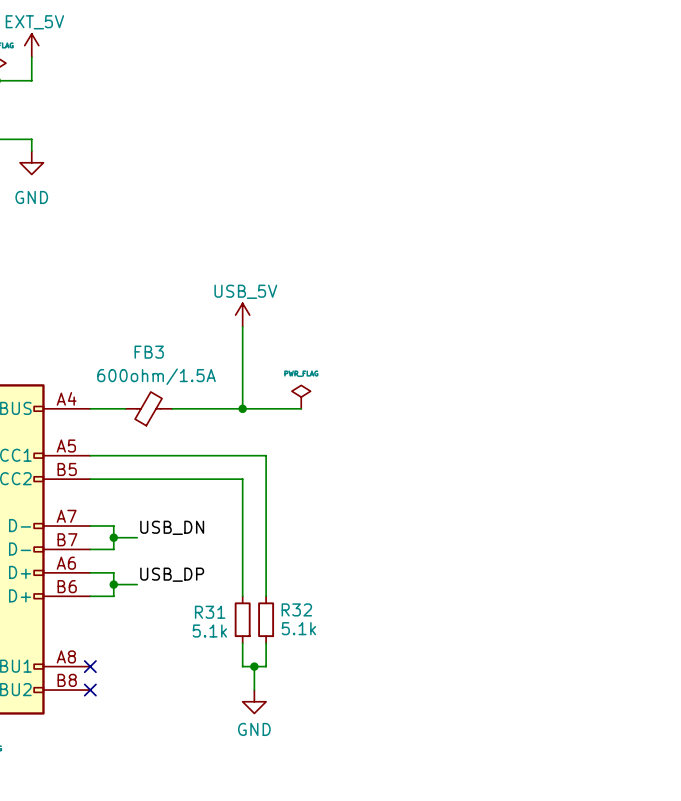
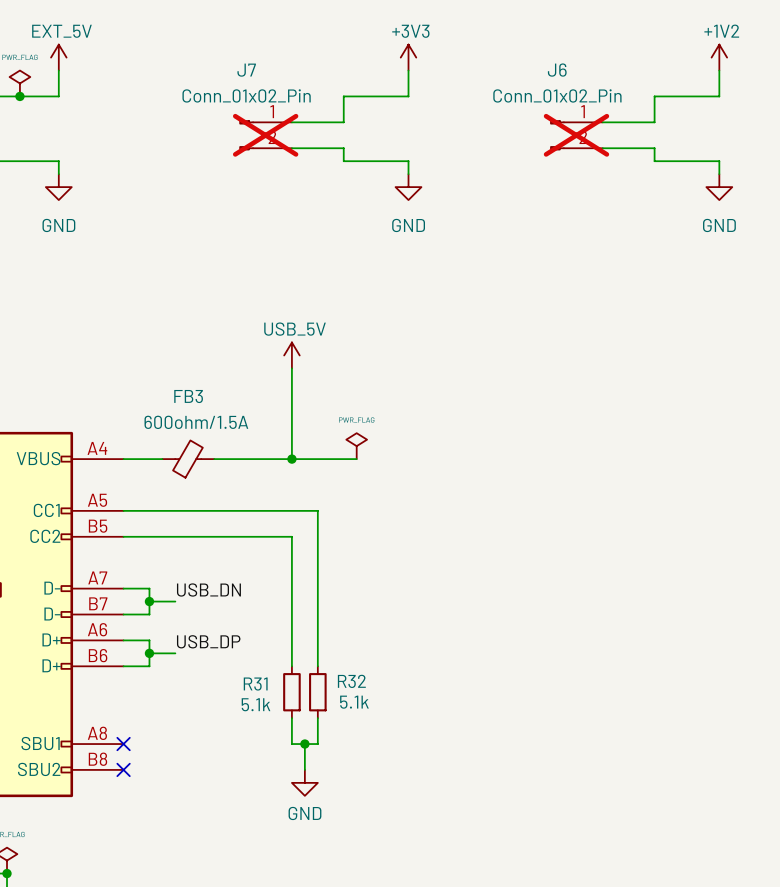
power symbol: none -> +3V3 (408, 57)
power symbol: none -> +1V2 (719, 57)
wire: none -> (408, 70) (408, 96) (343, 96) (343, 122) (291, 122)
wire: none -> (719, 70) (719, 96) (654, 96) (654, 122) (602, 122)
J7: none -> Conn_01x02_Pin (265, 135)
J6: none -> Conn_01x02_Pin (576, 135)
wire: none -> (291, 148) (343, 148) (343, 161) (408, 161) (408, 174)
wire: none -> (602, 148) (654, 148) (654, 161) (719, 161) (719, 174)
power symbol: none -> GND (408, 187)
power symbol: none -> GND (719, 187)

